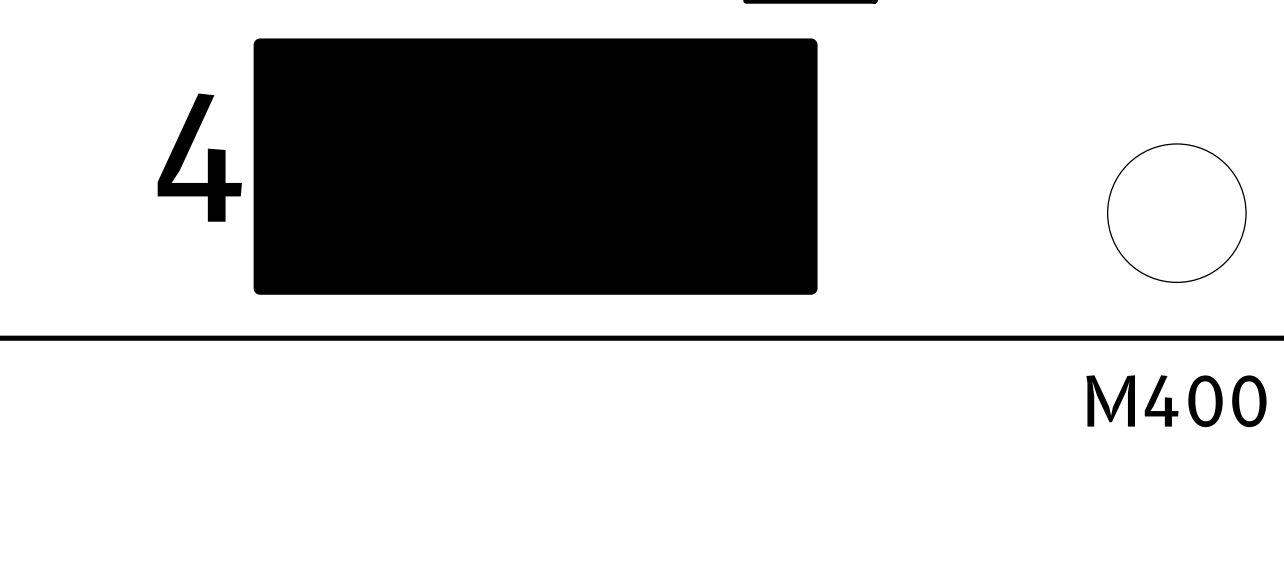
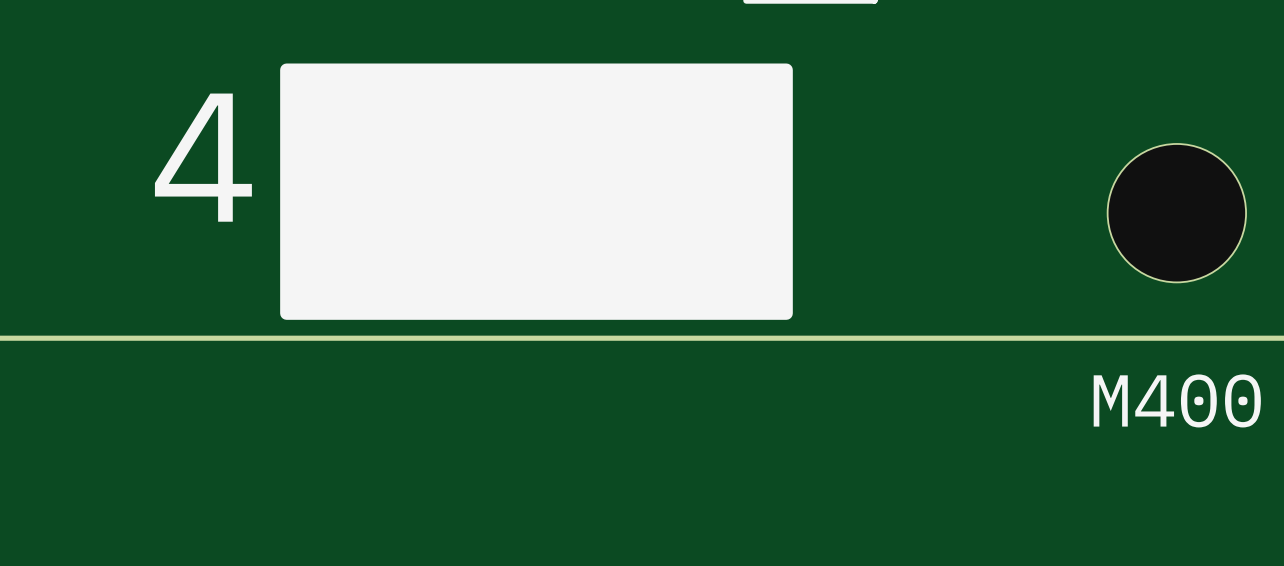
drawing shape: [253, 38, 818, 295] -> [280, 63, 793, 320]

